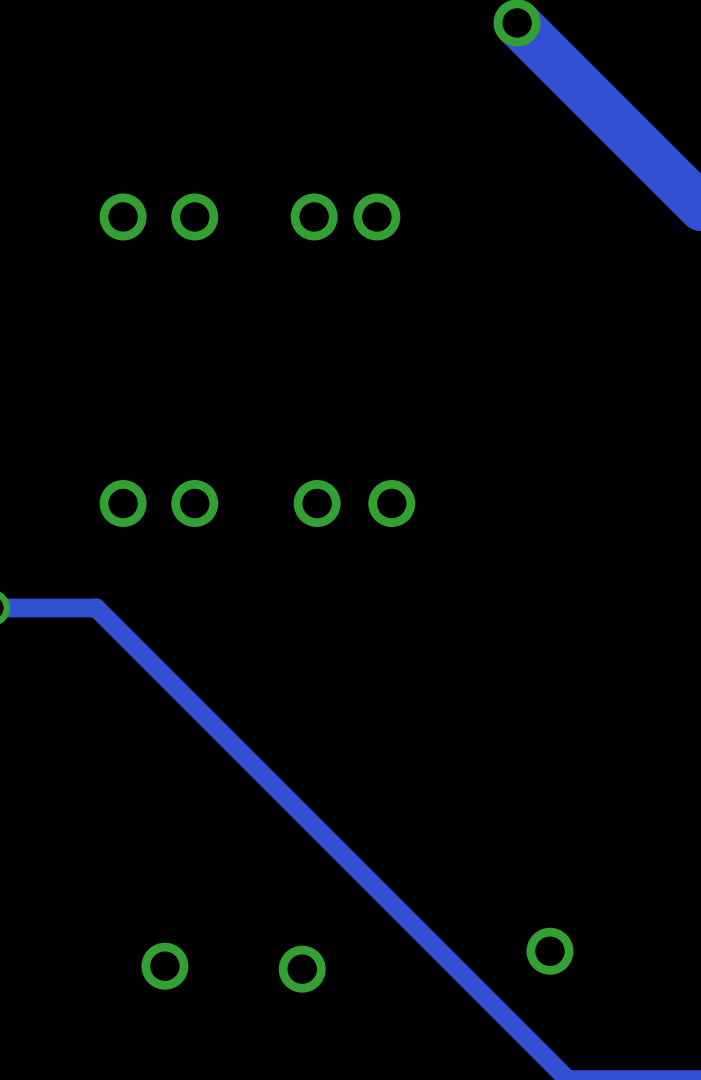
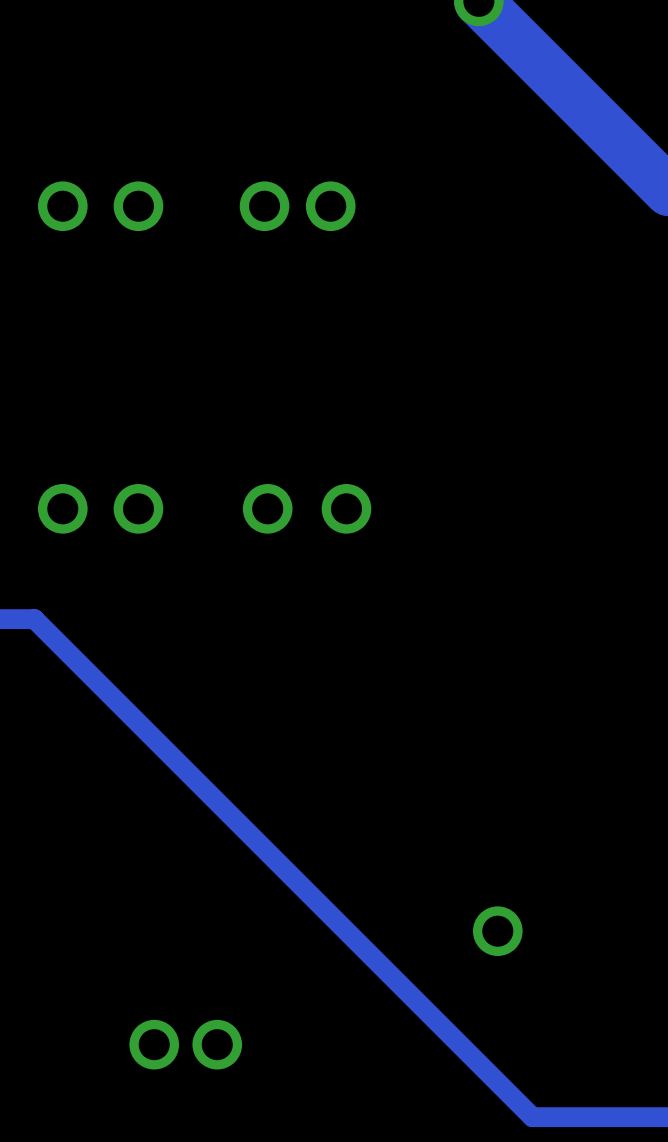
via position: (549, 951) -> (497, 931)
via: (164, 966) -> none
via position: (302, 969) -> (217, 1044)
via: none -> (154, 1044)

